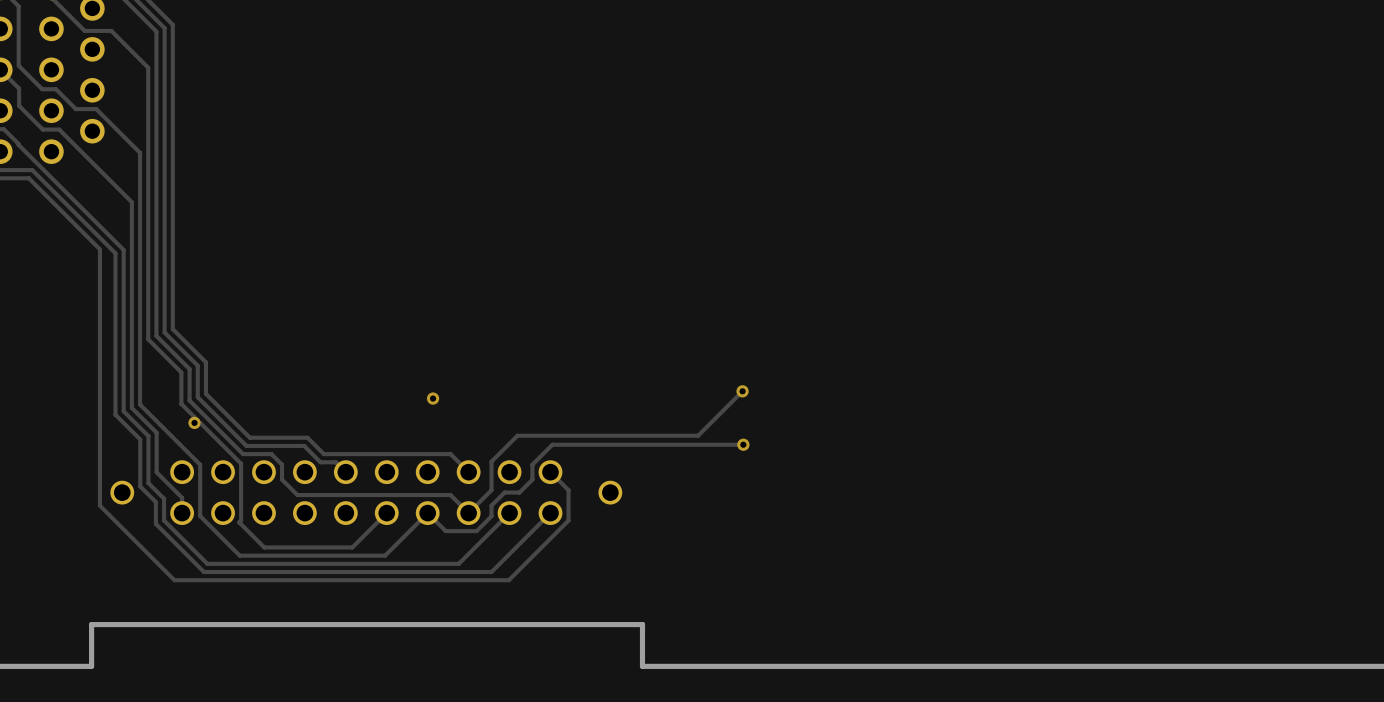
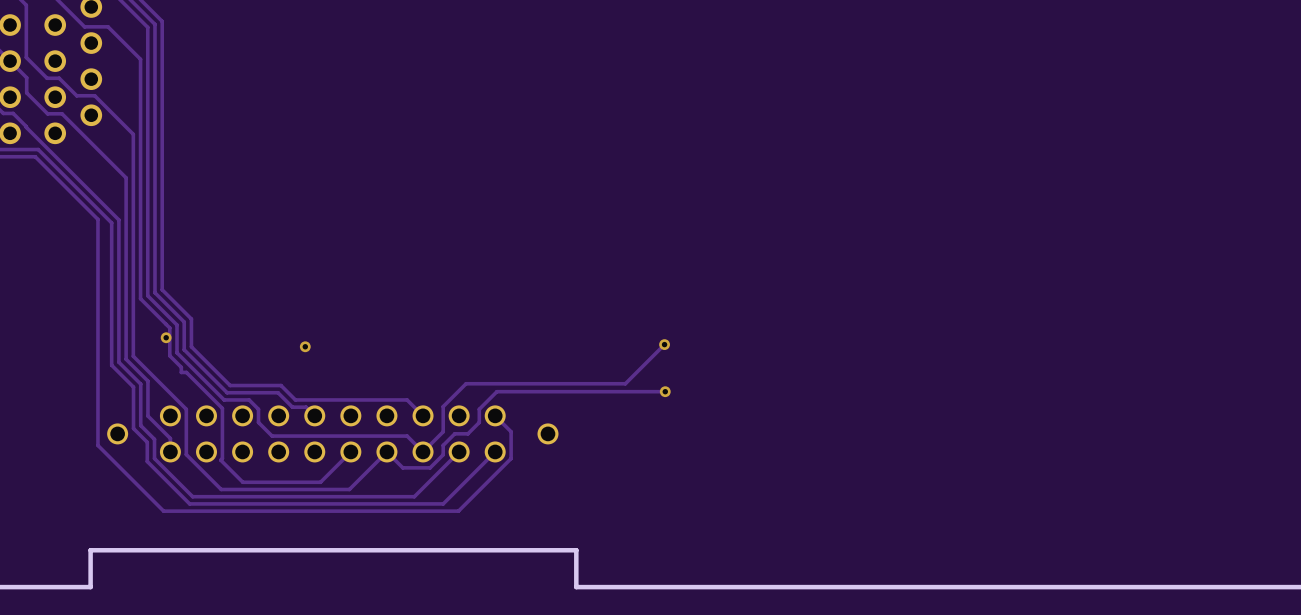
via: none -> (305, 346)
via: (433, 398) -> none
via position: (194, 422) -> (166, 337)

